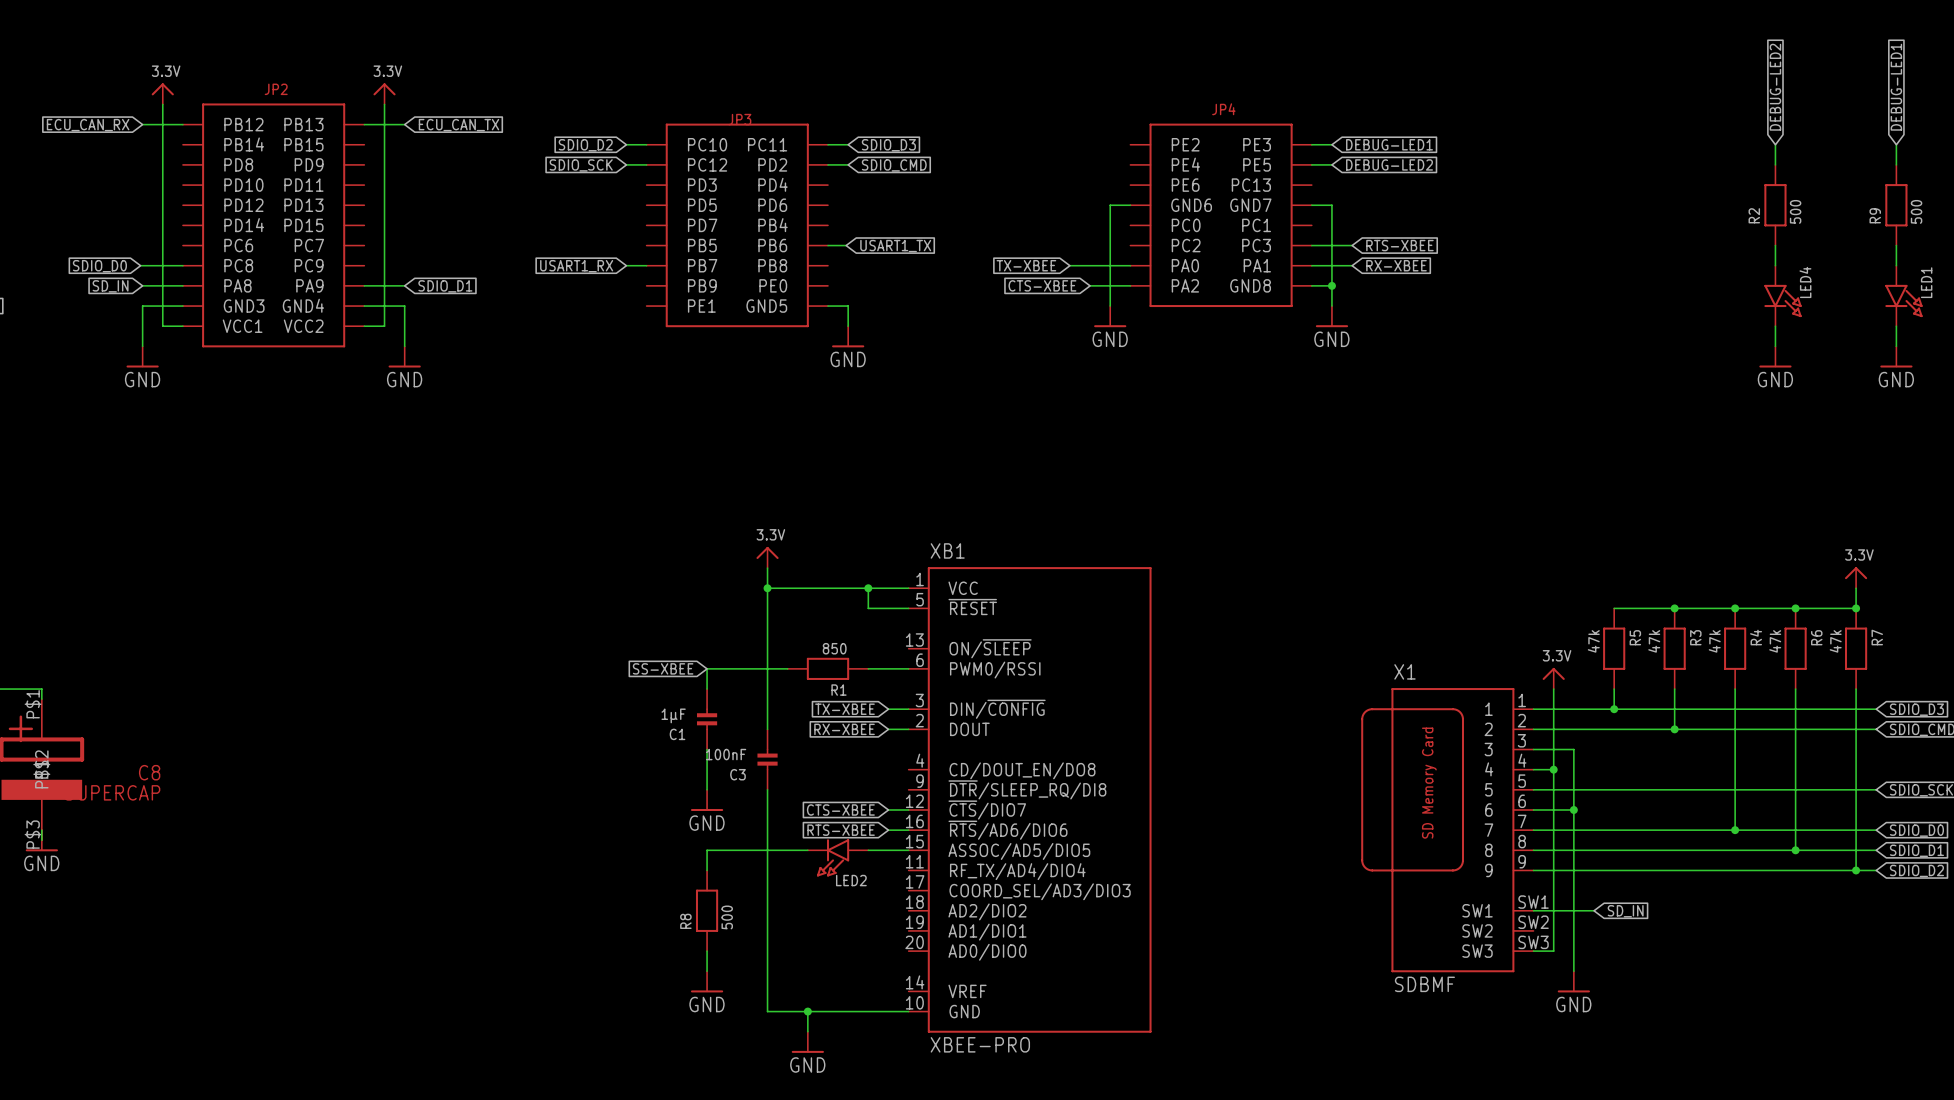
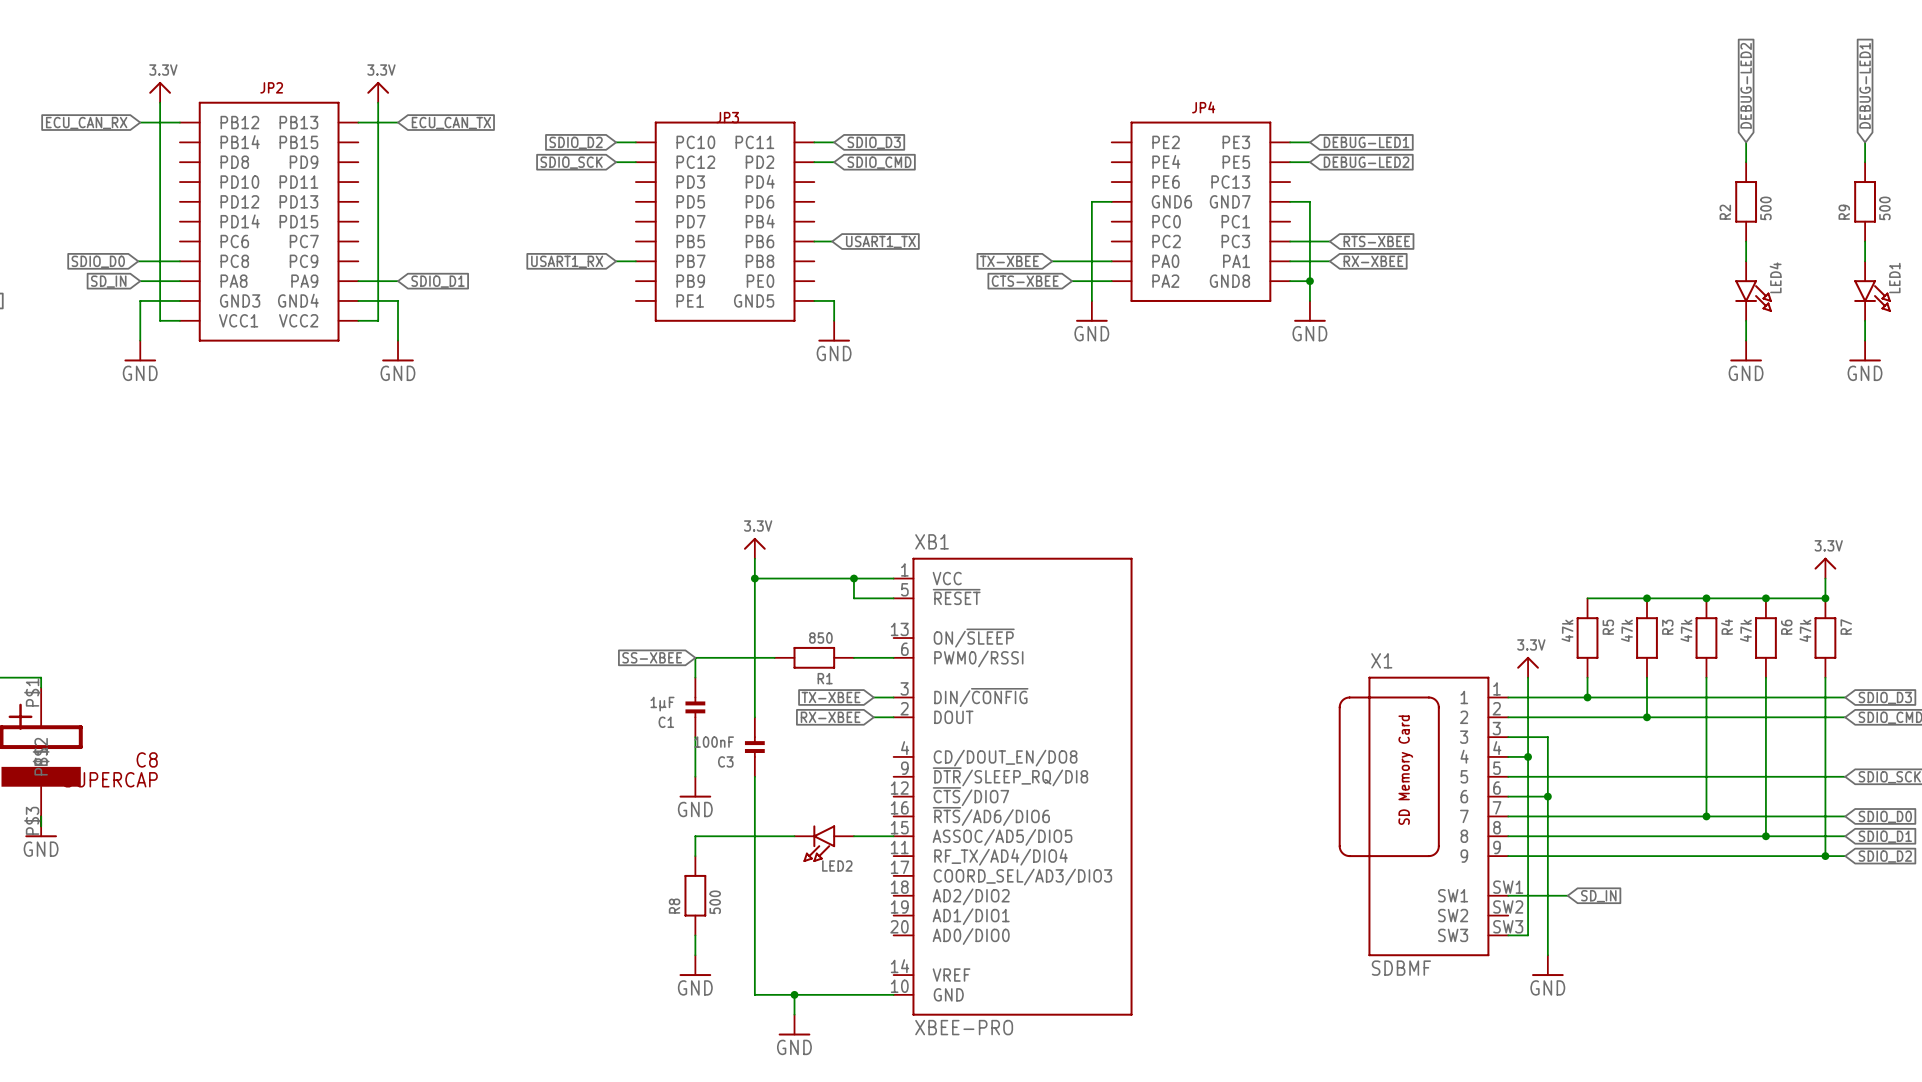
global label: CTS-XBEE (840, 809) -> none
wire: (888, 809) (908, 809) -> none
global label: RTS-XBEE (841, 830) -> none
wire: (888, 830) (908, 830) -> none

